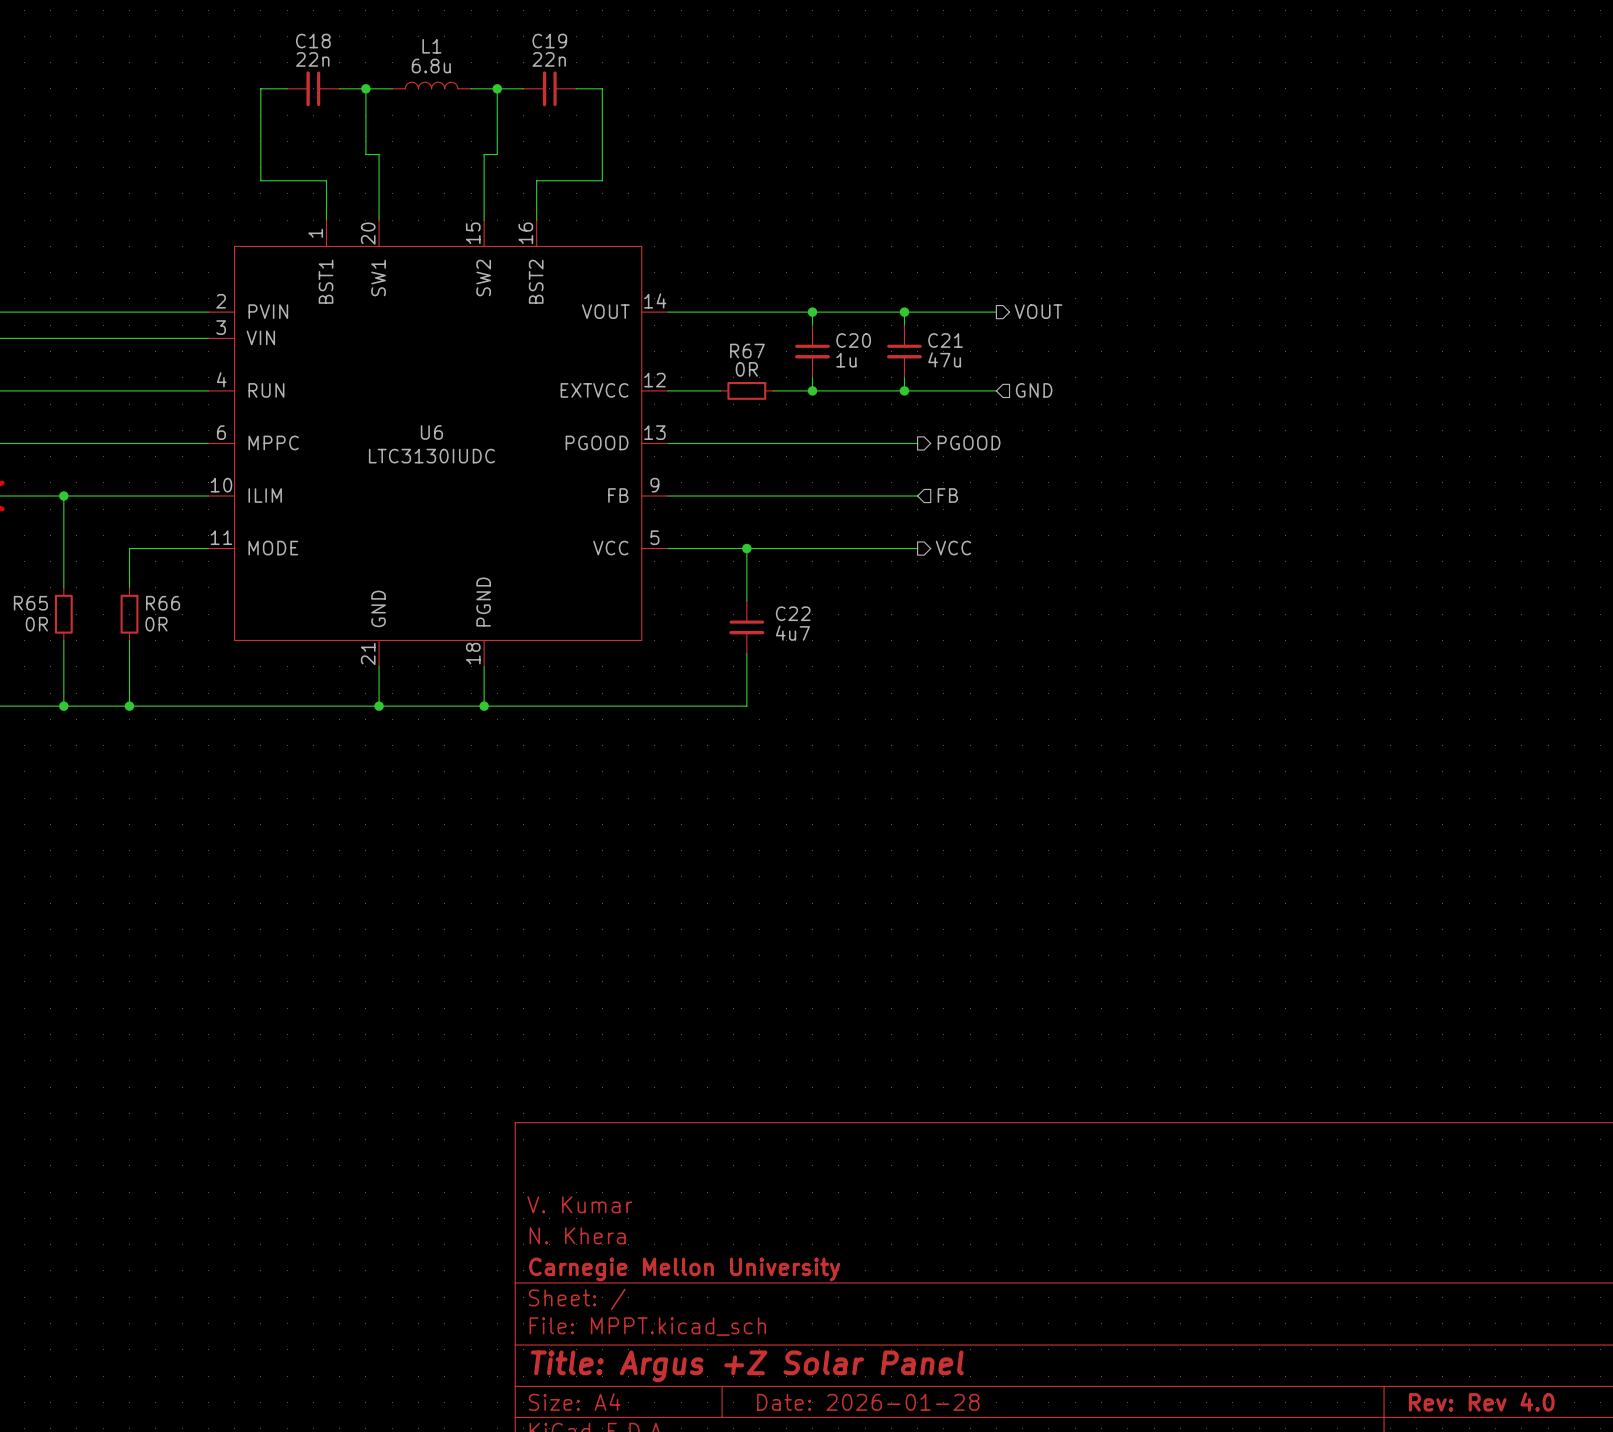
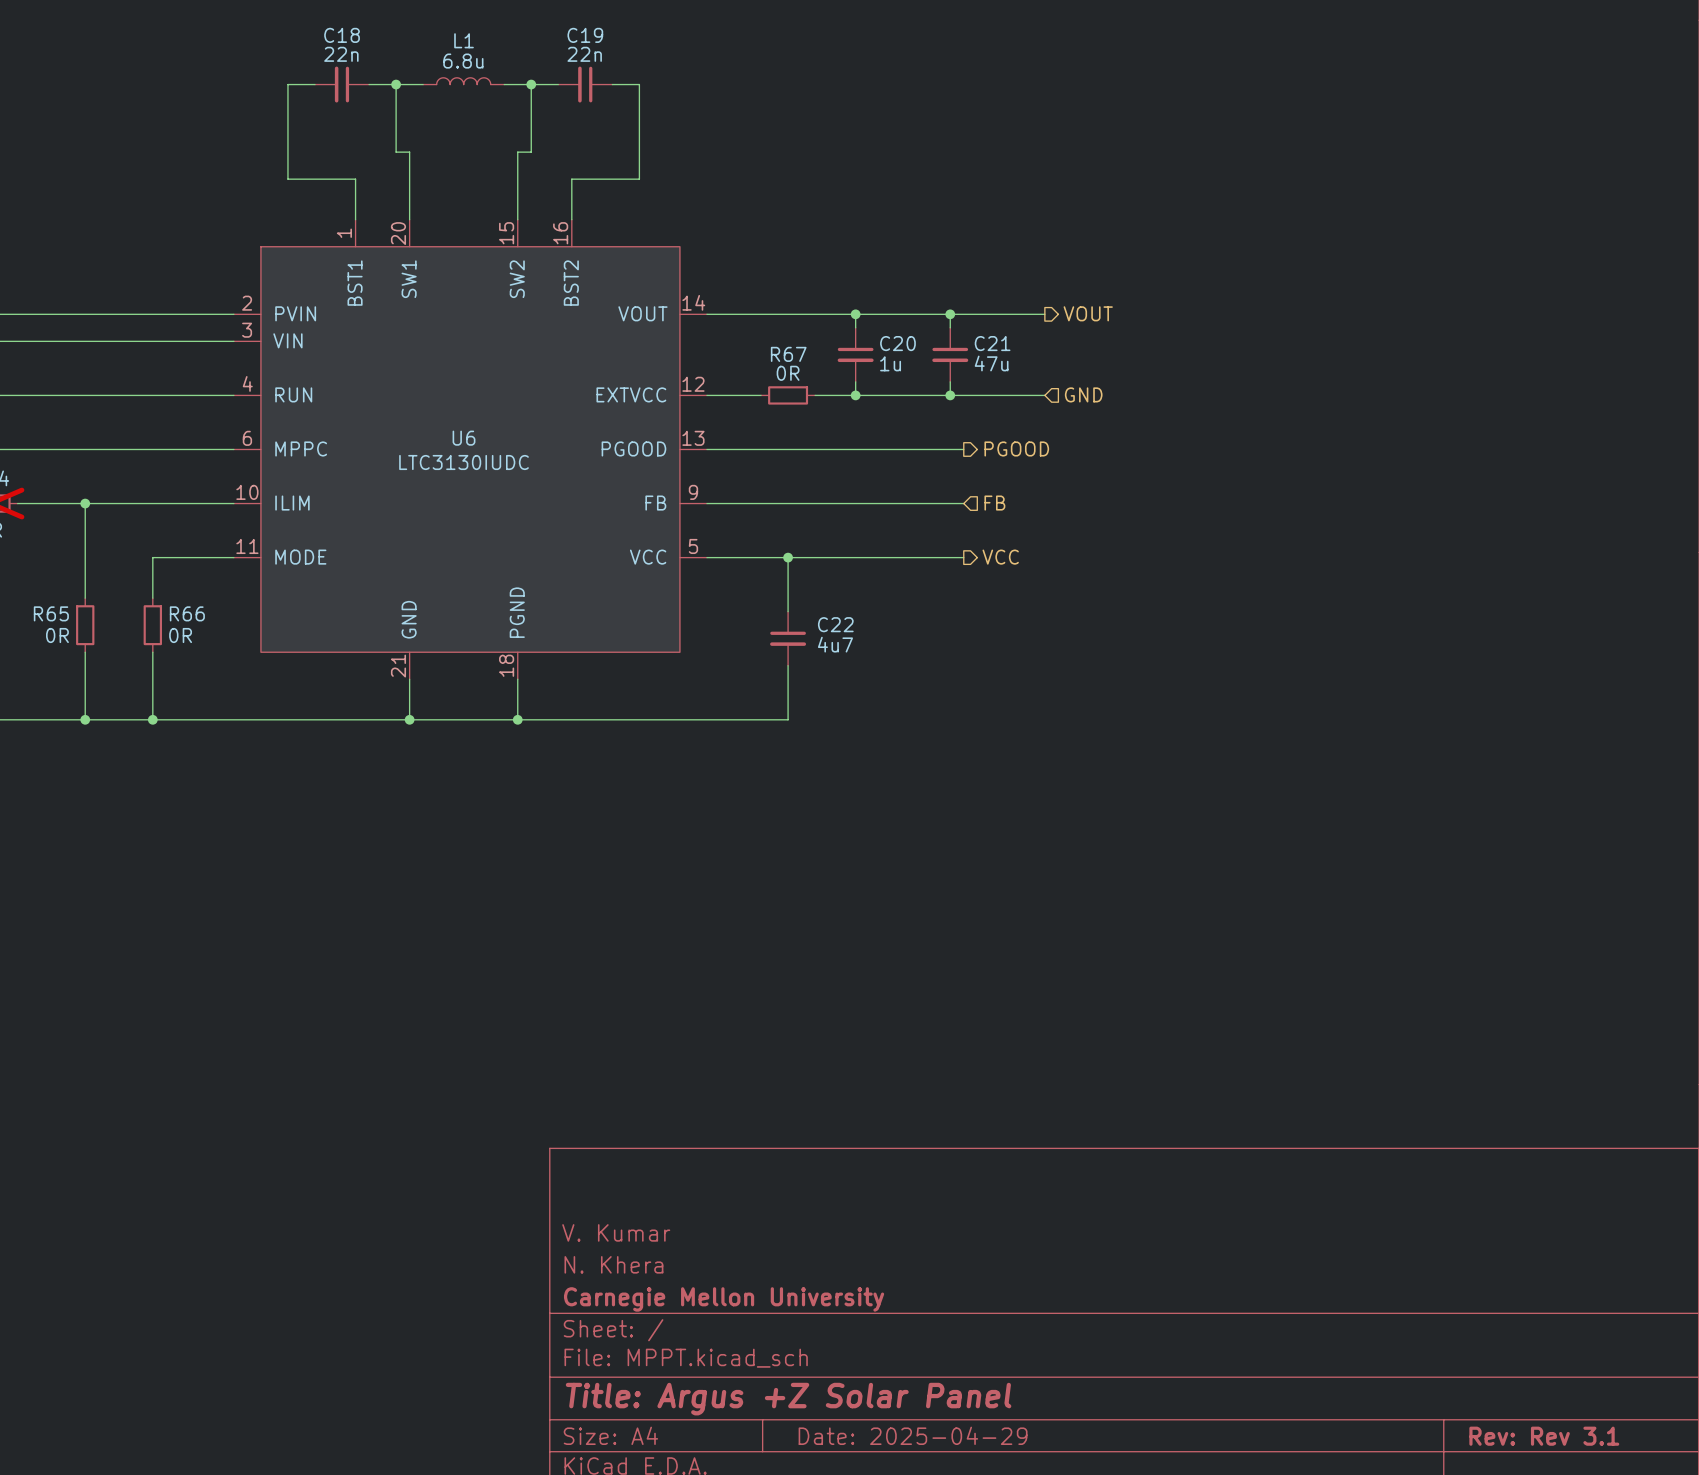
title block: Rev: Rev 4.0 (1481, 1401) -> Rev: Rev 3.1 (1544, 1436)
title block: Date: 2026-01-28 (868, 1402) -> Date: 2025-04-29 (913, 1435)

